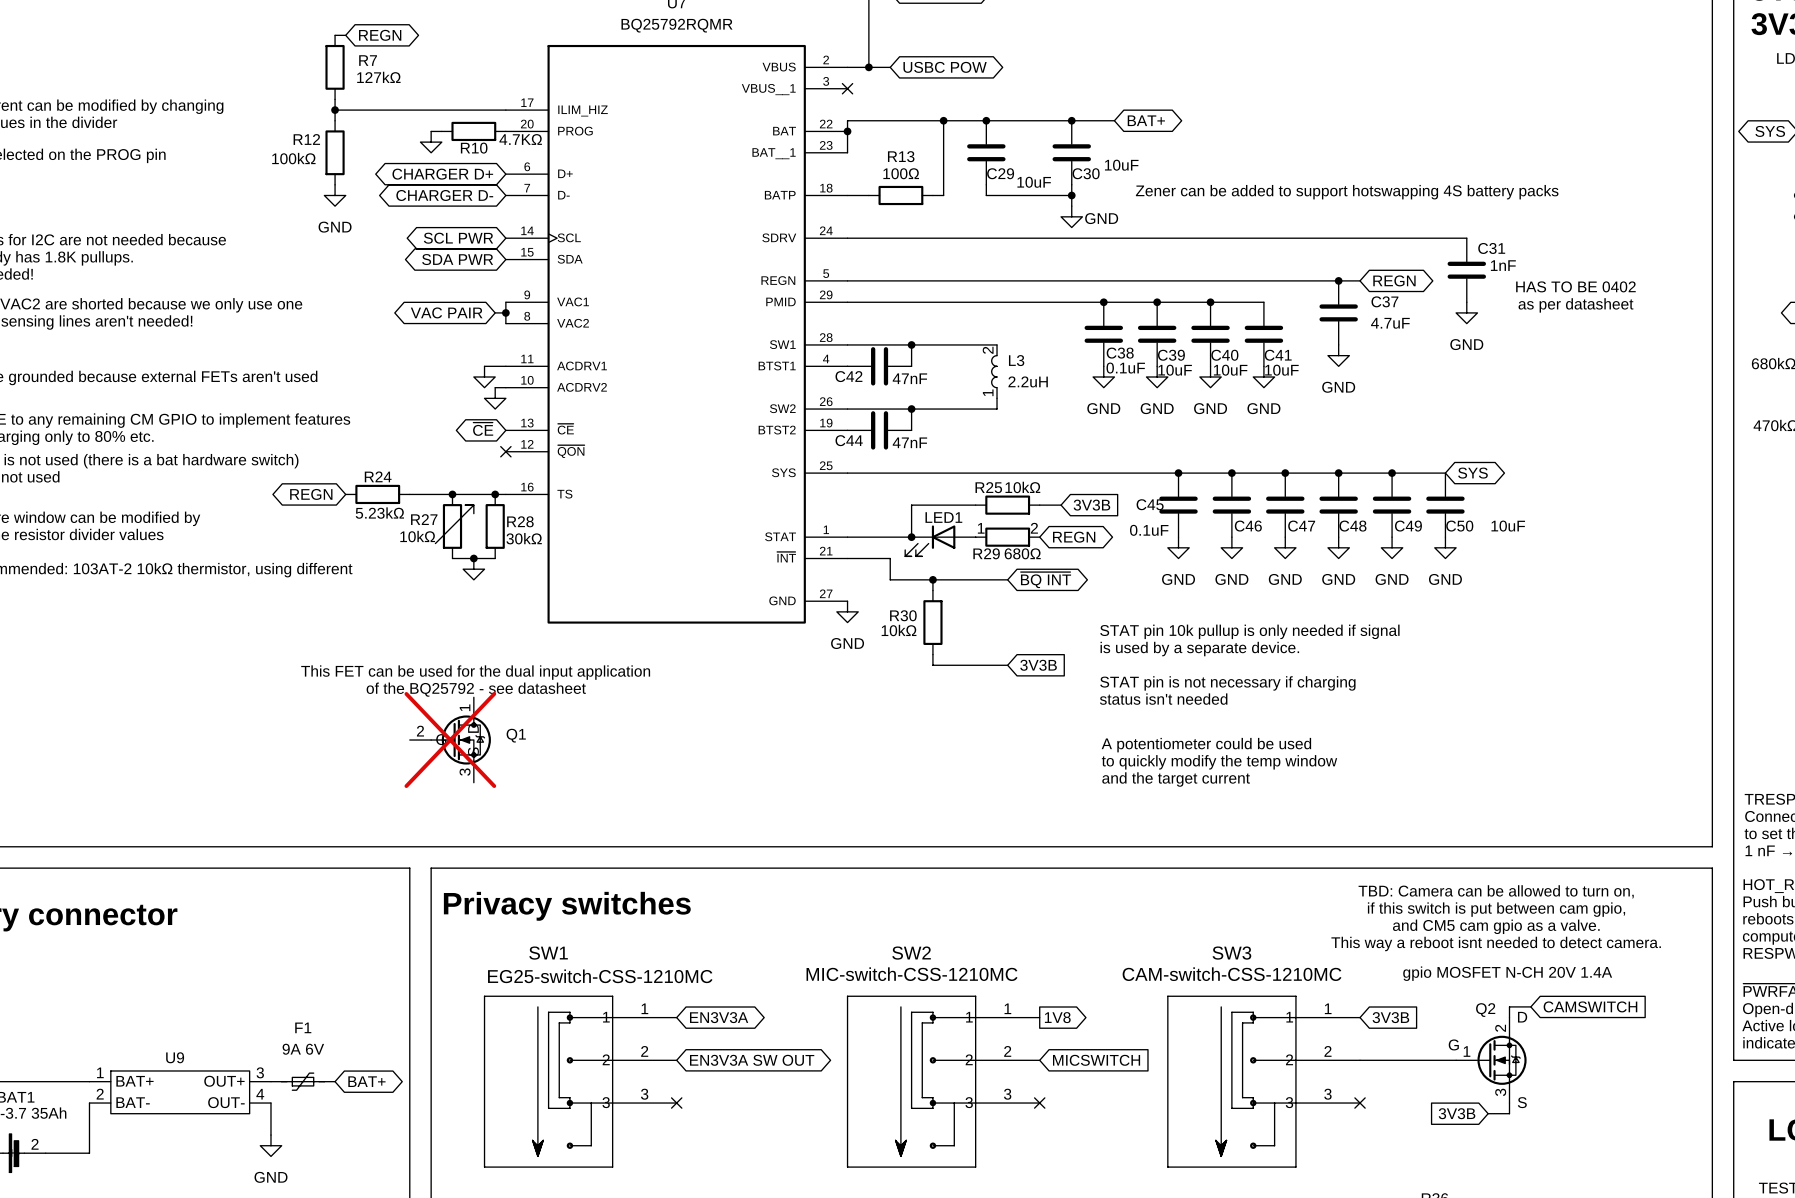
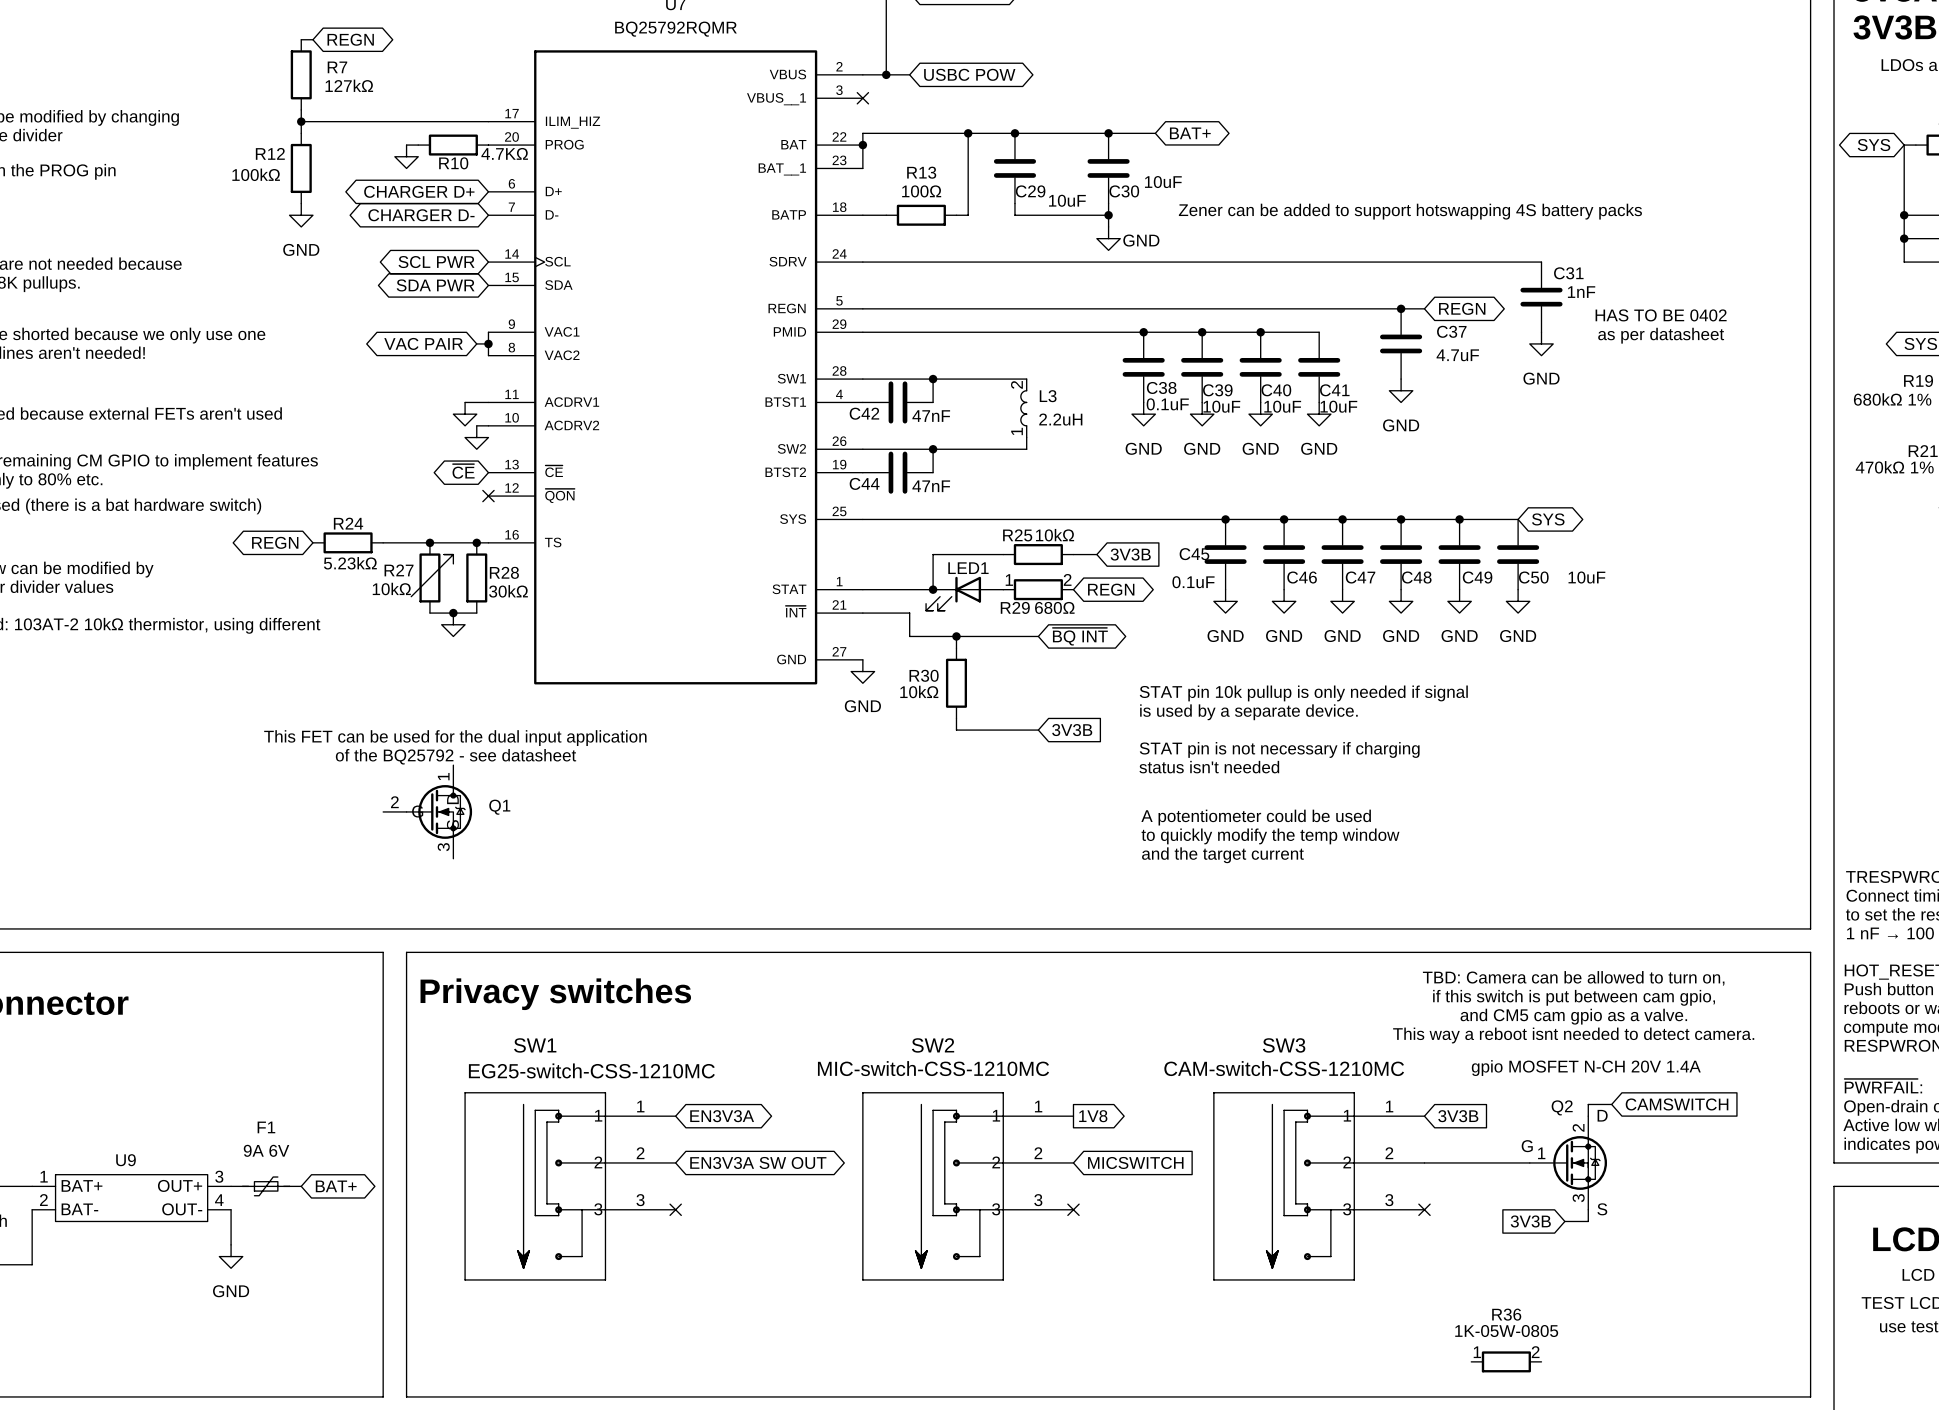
Q1 do-not-place cross: (450, 740) -> none

